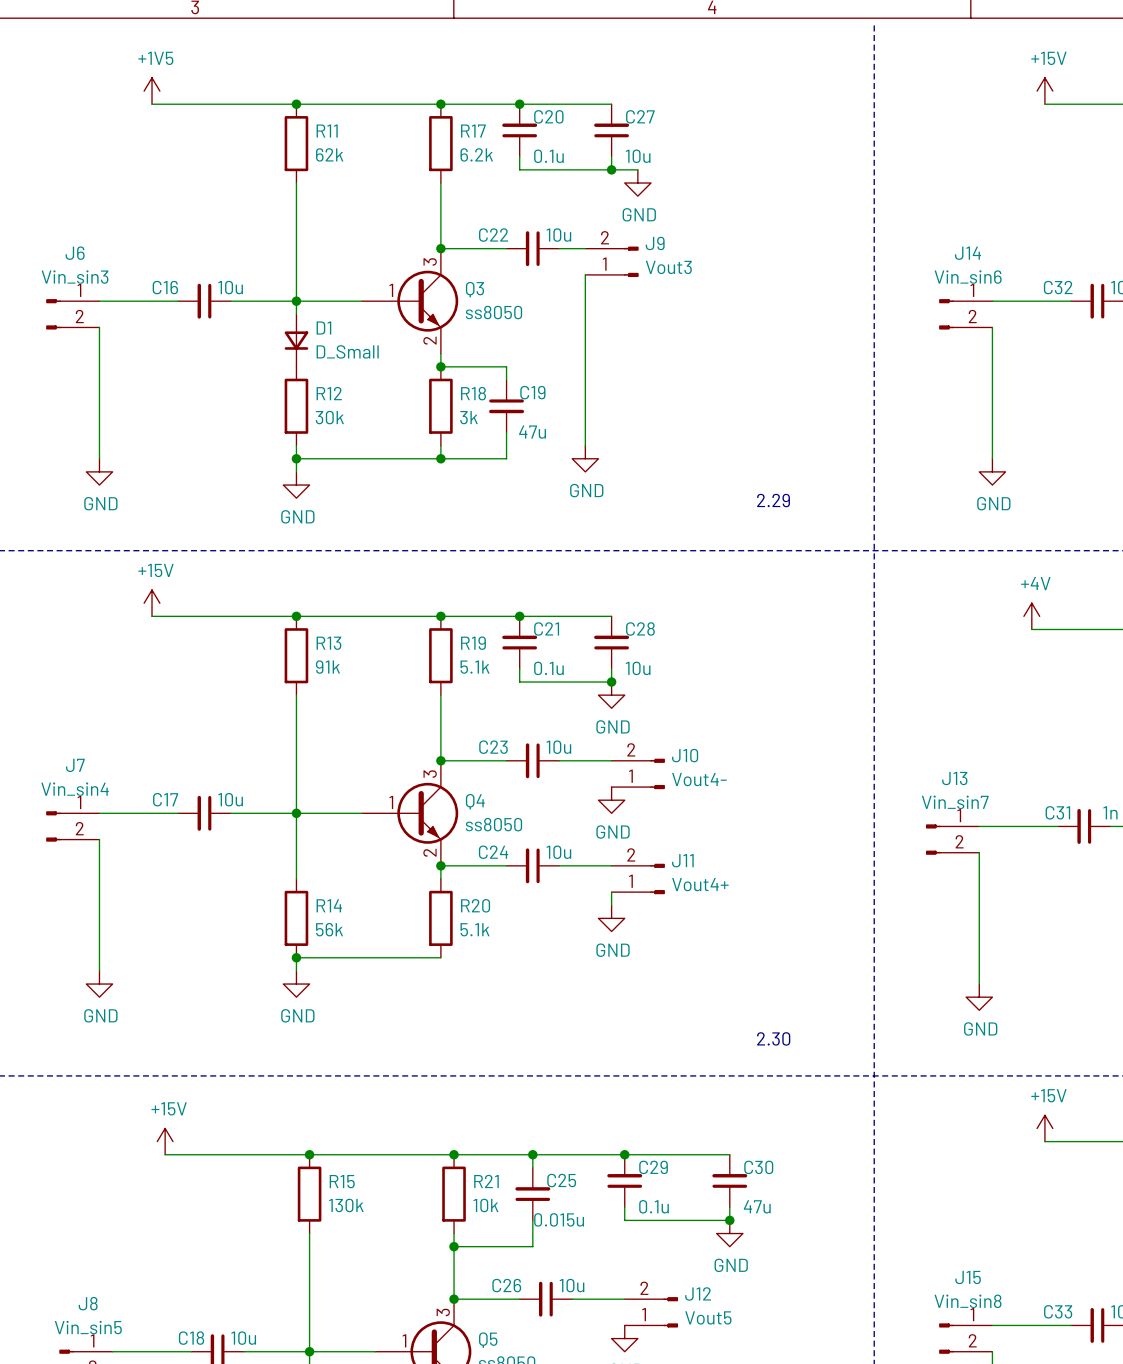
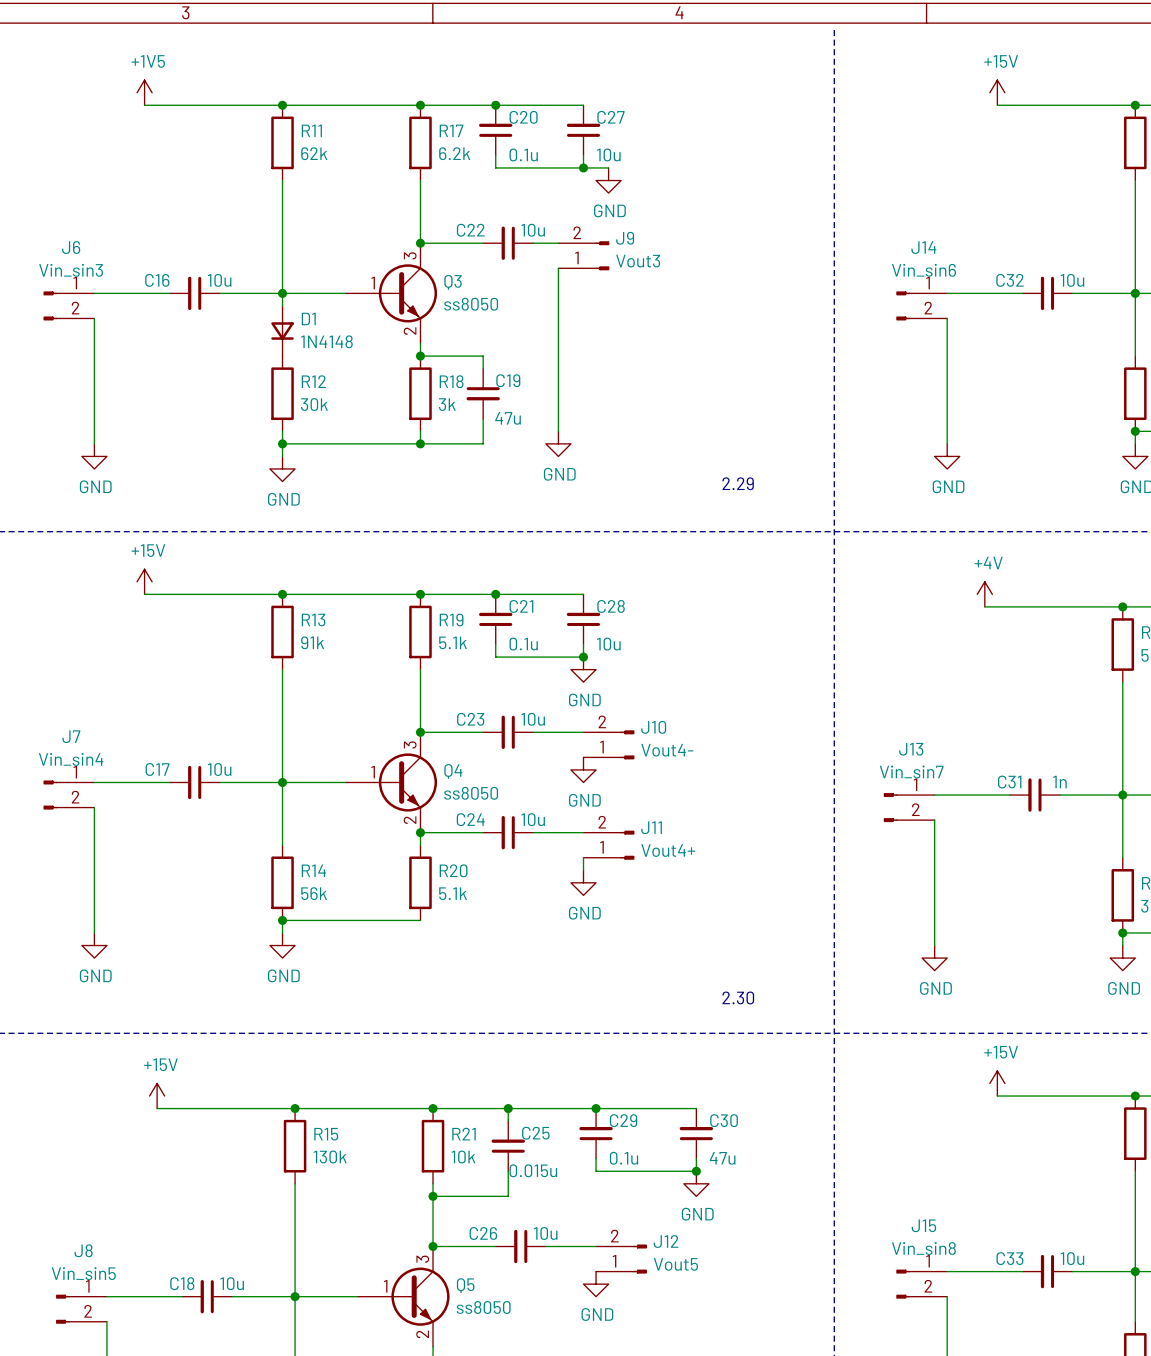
D1 value: D_Small (347, 351) -> 1N4148 (326, 341)

